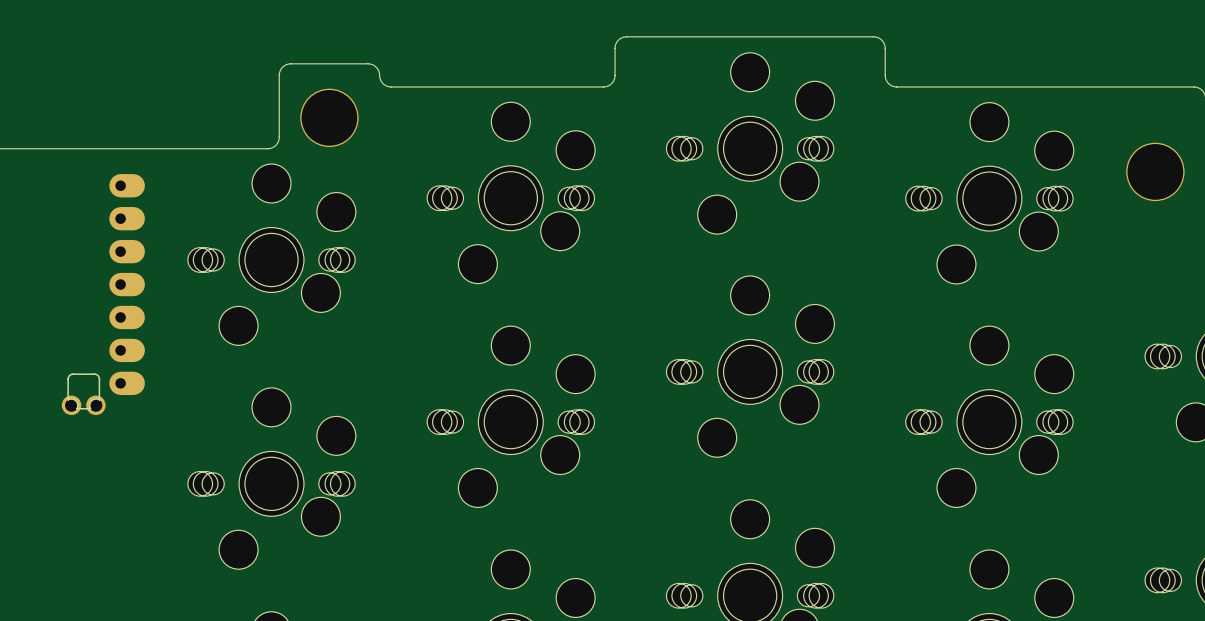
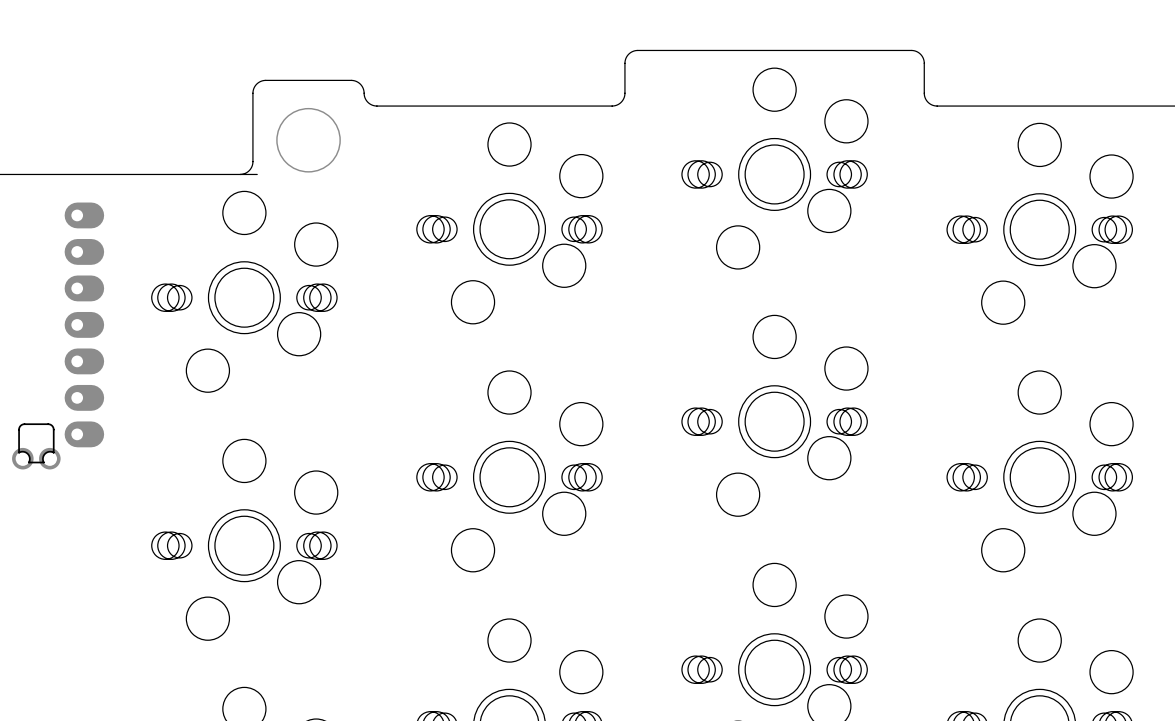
board edge: none -> (240, 174) (257, 174)

